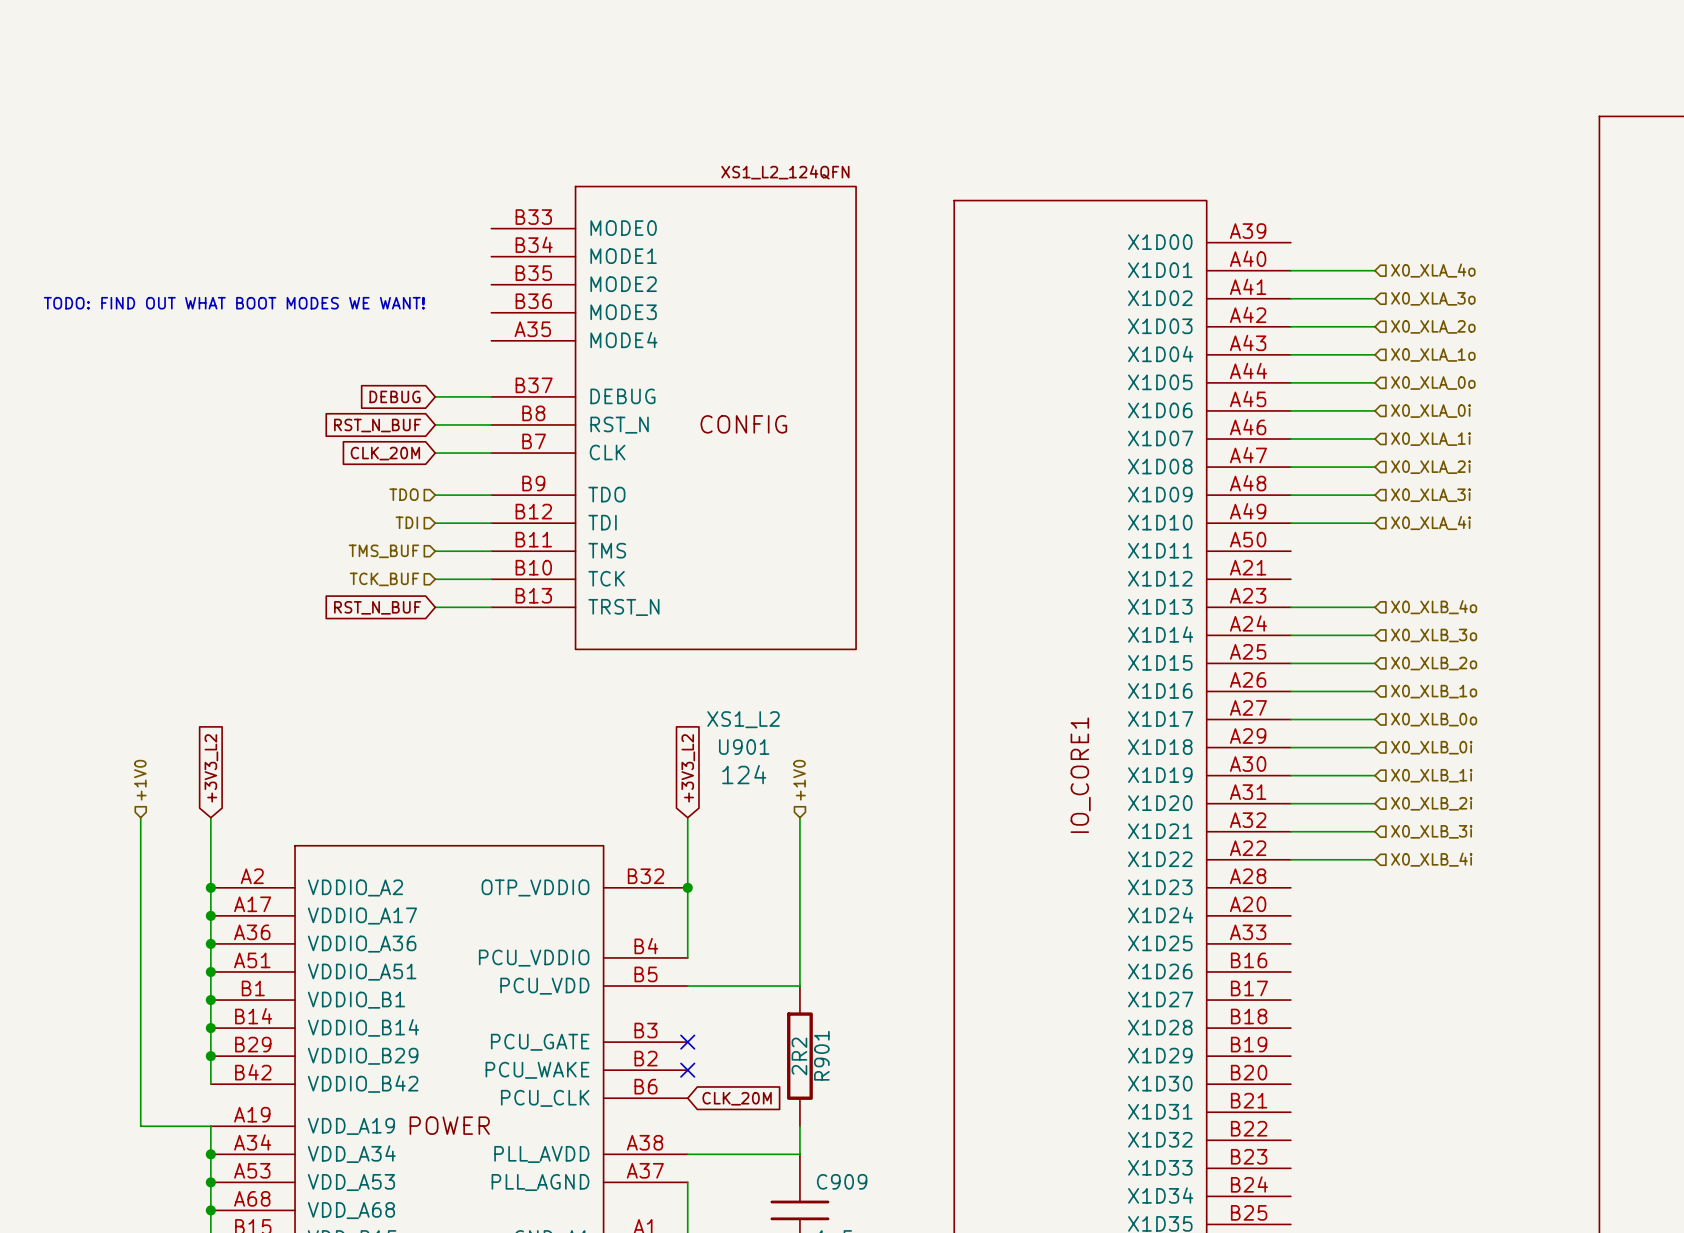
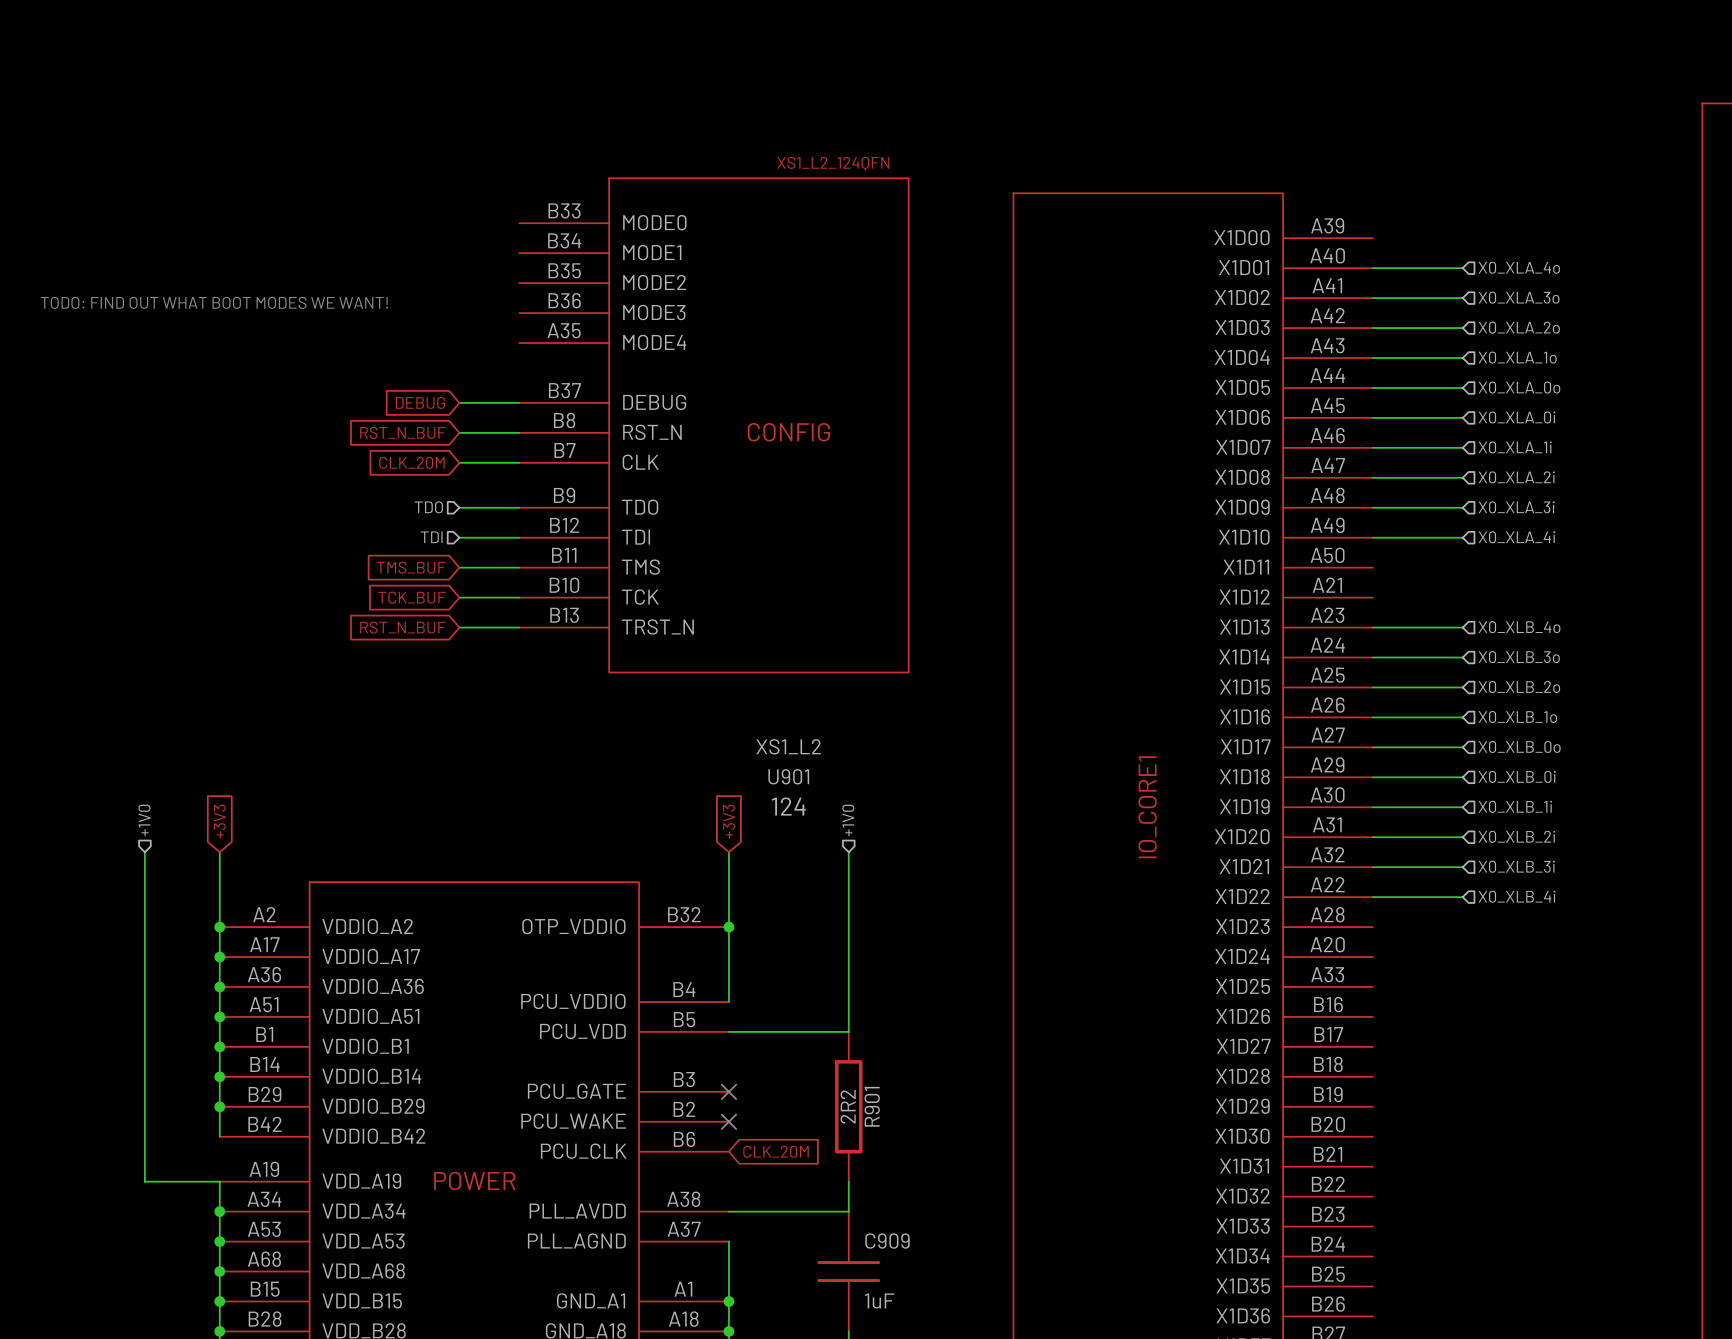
hierarchical label: TMS_BUF (383, 551) -> none
global label: none -> TMS_BUF (411, 567)
hierarchical label: TCK_BUF (384, 579) -> none
global label: none -> TCK_BUF (412, 597)
global label: +3V3_L2 (211, 768) -> +3V3 (219, 821)
global label: +3V3_L2 (688, 768) -> +3V3 (729, 821)

